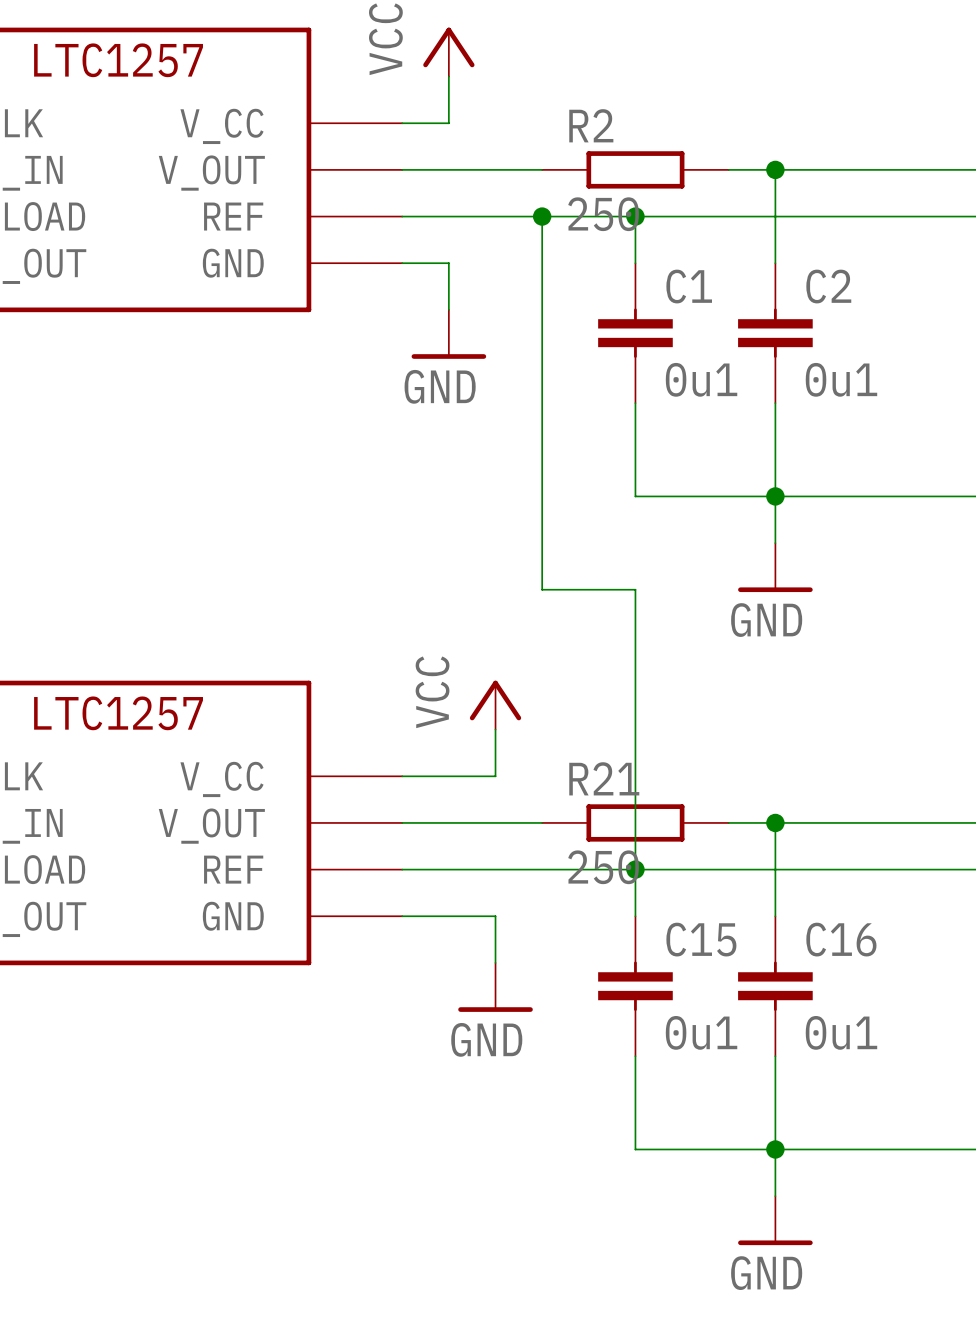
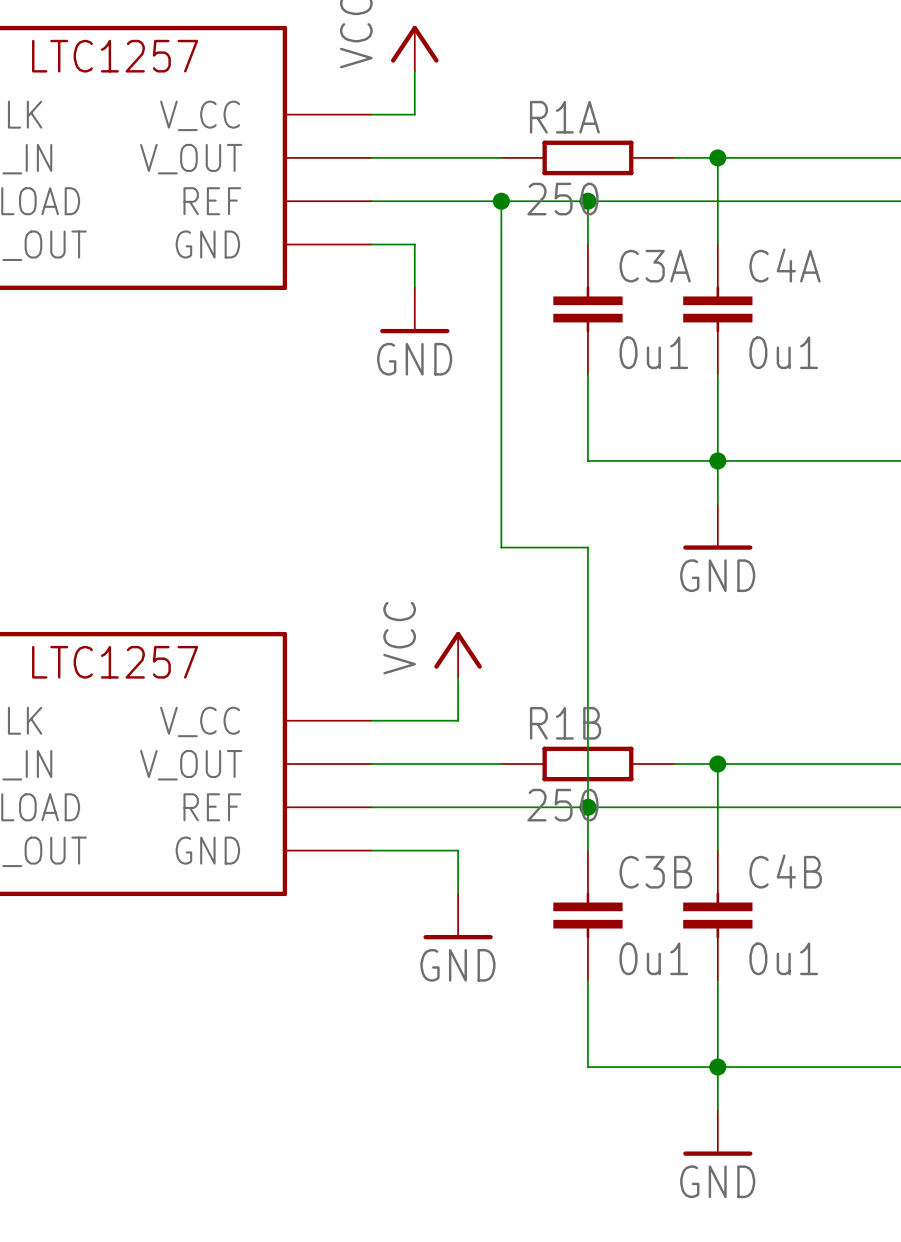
R2 name: R2 (591, 125) -> R1A (564, 117)
C1 name: C1 (689, 286) -> C3A (655, 266)
C2 name: C2 (828, 286) -> C4A (785, 265)
R21 name: R21 (604, 778) -> R1B (565, 723)
C15 name: C15 (701, 939) -> C3B (655, 872)
C16 name: C16 (841, 939) -> C4B (785, 871)

